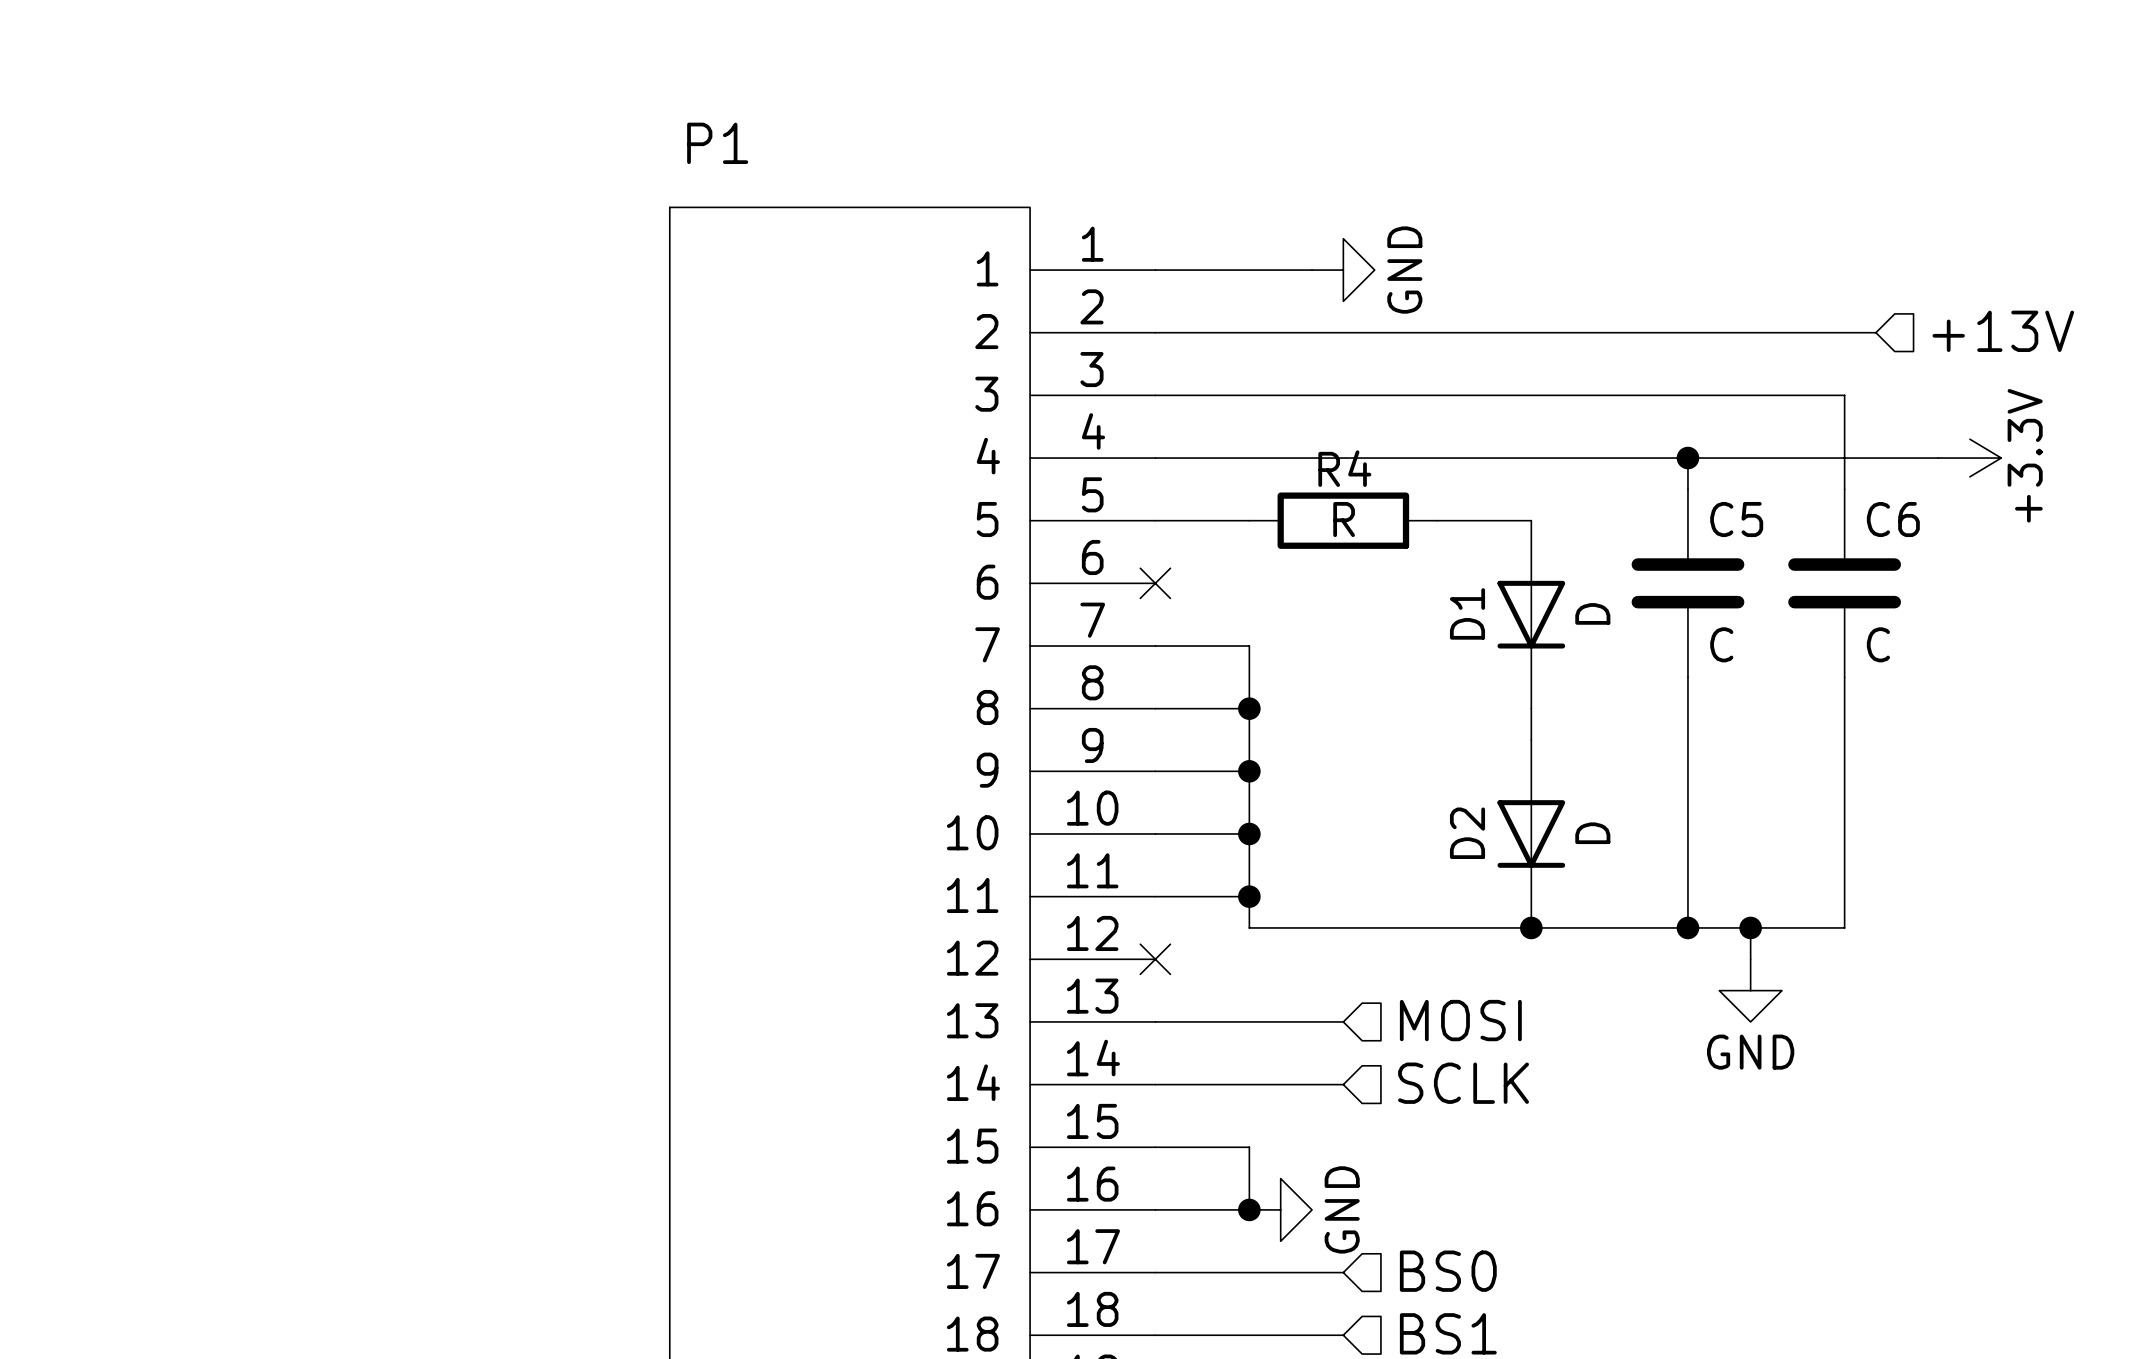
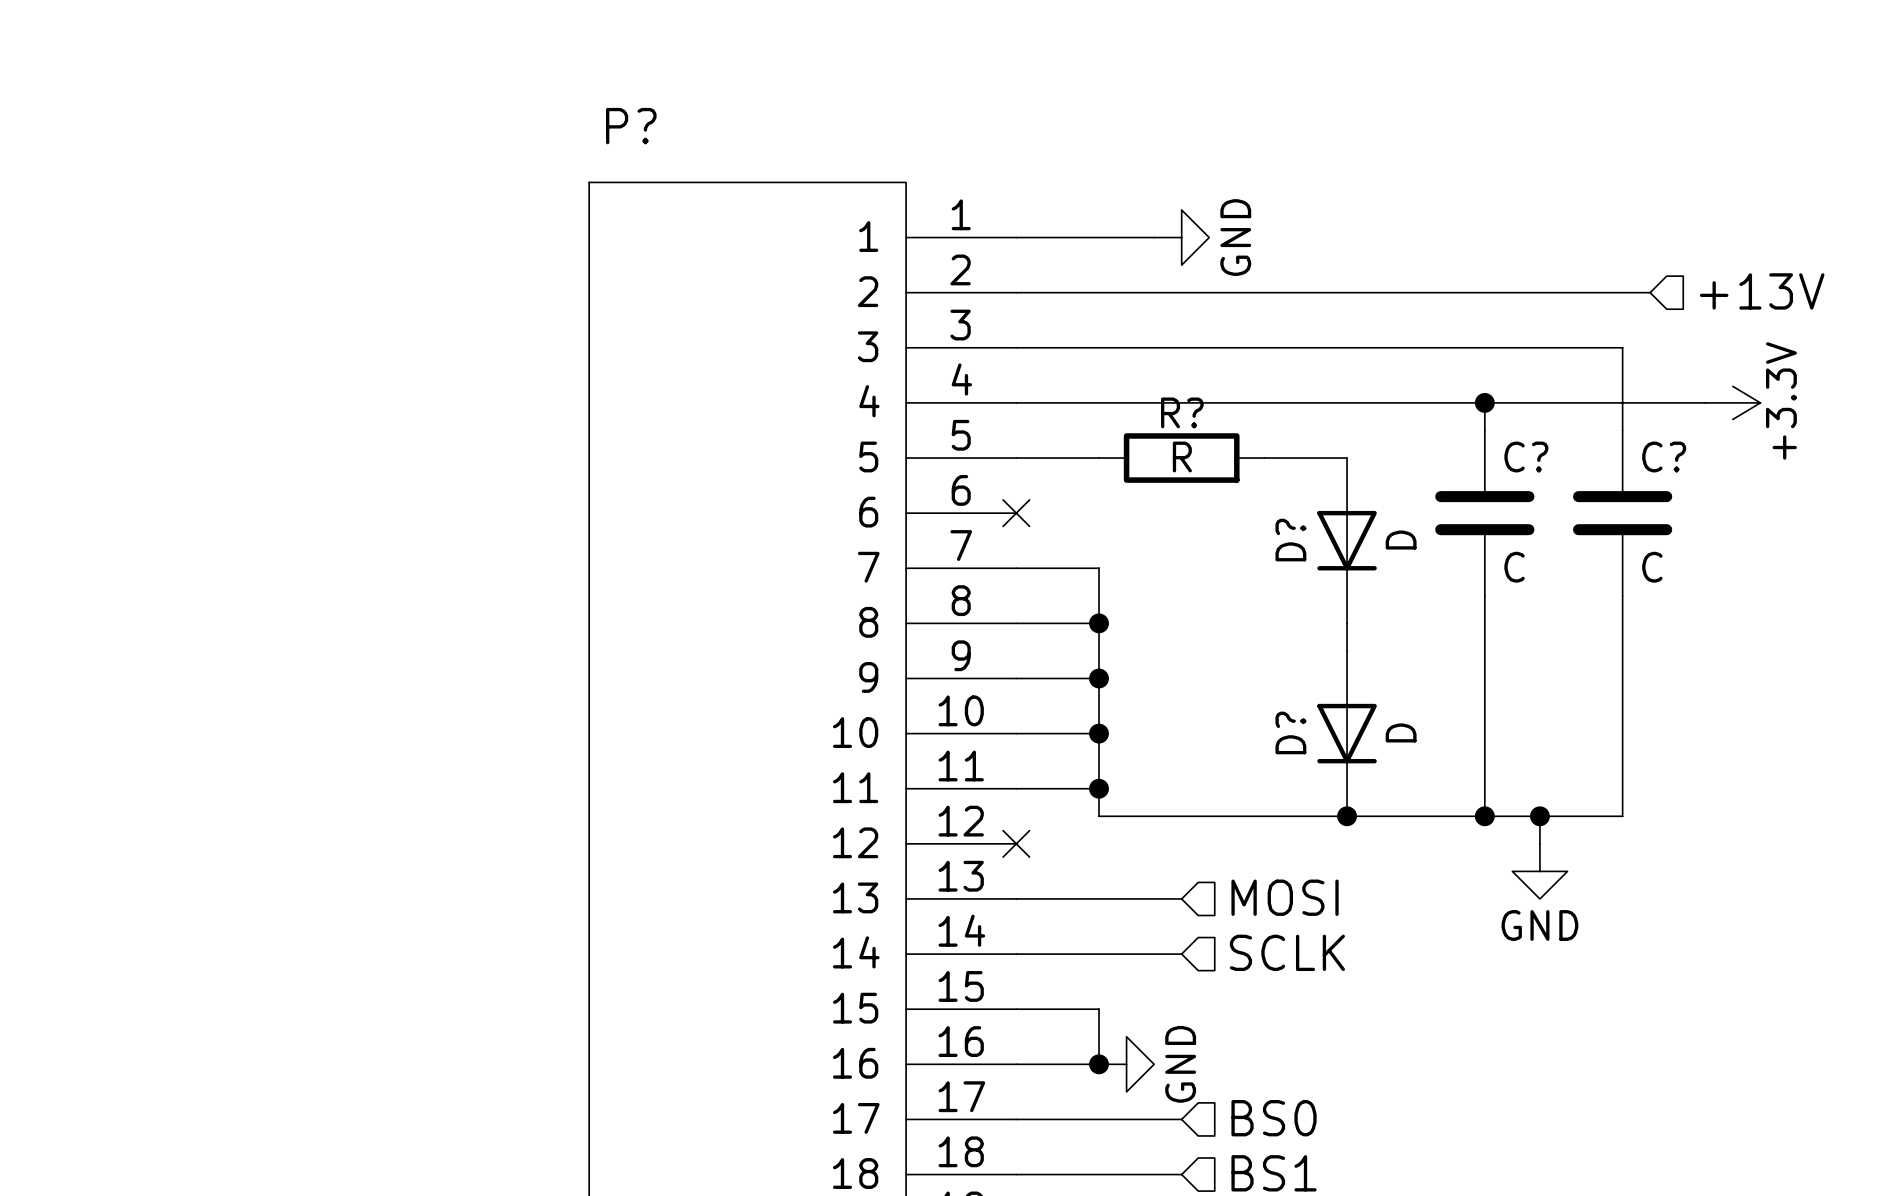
P1 name: P1 (717, 143) -> P? (631, 126)
R4 name: R4 (1344, 468) -> R? (1182, 412)
C5 name: C5 (1736, 519) -> C? (1526, 456)
C6 name: C6 (1893, 519) -> C? (1664, 456)
D1 name: D1 (1467, 613) -> D? (1290, 540)
D2 name: D2 (1467, 833) -> D? (1290, 732)

